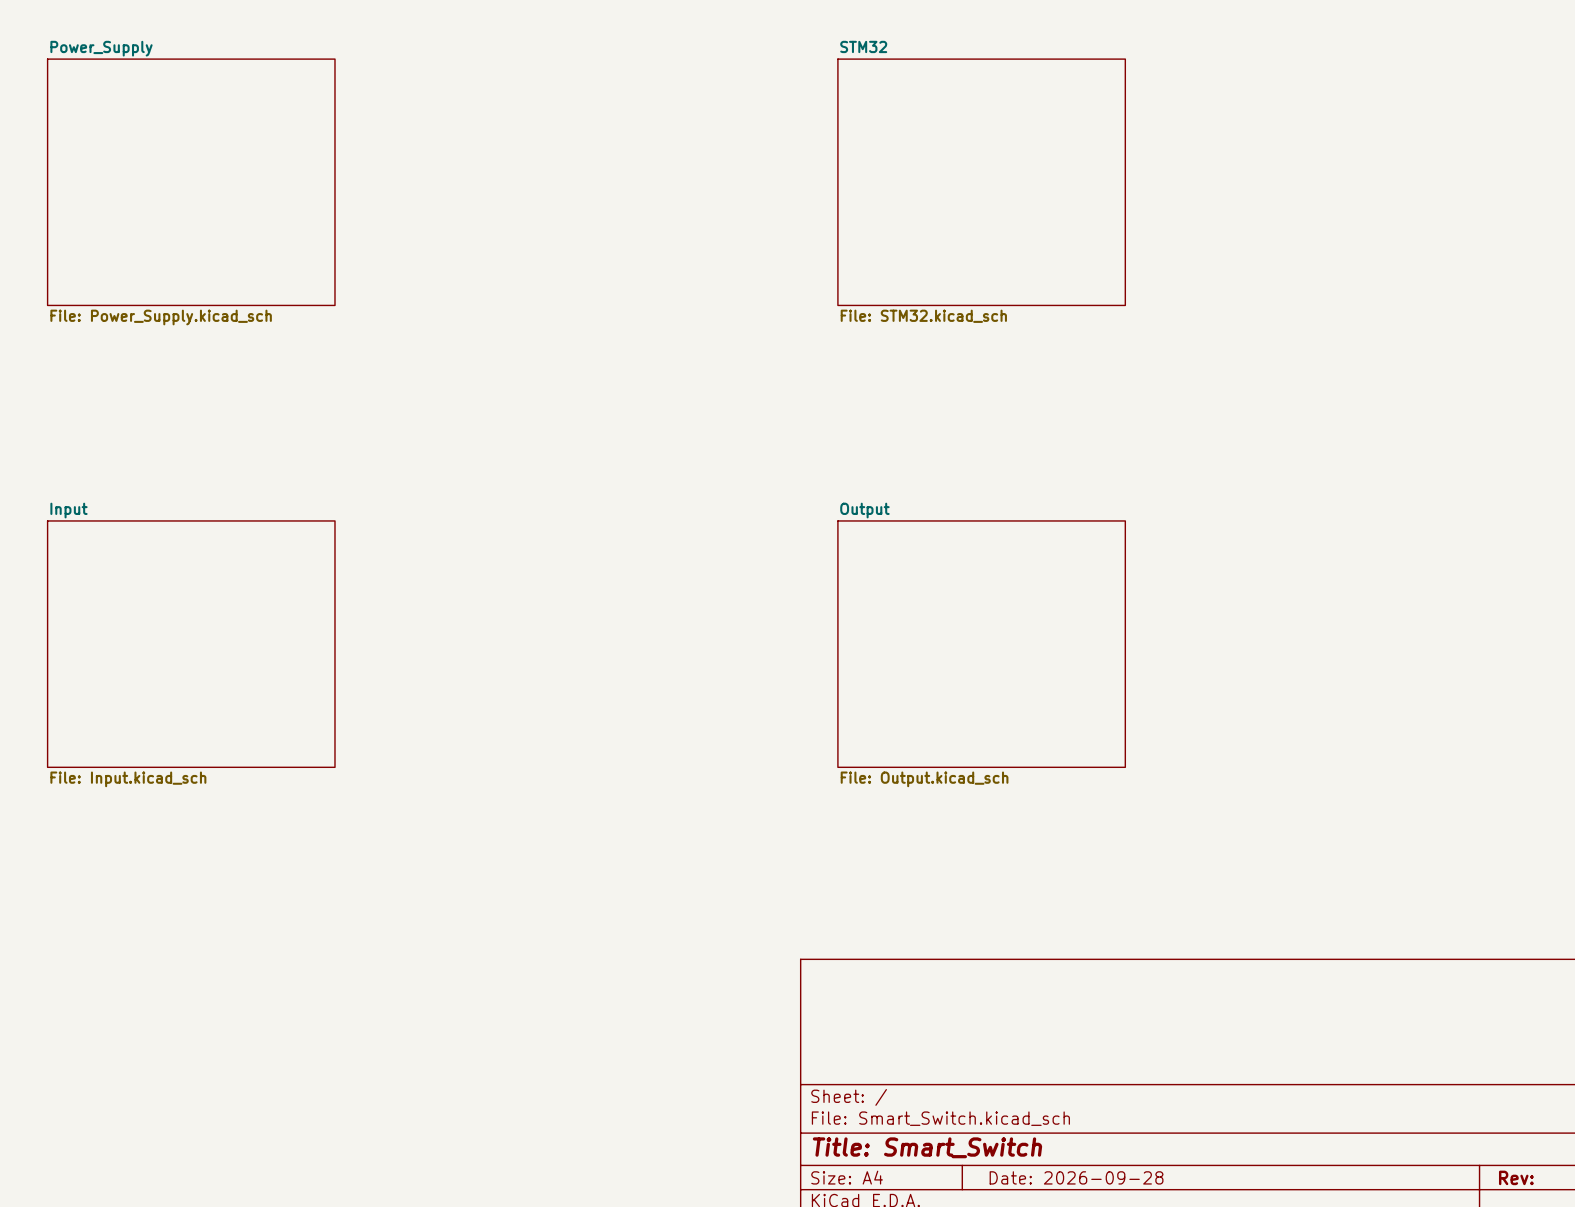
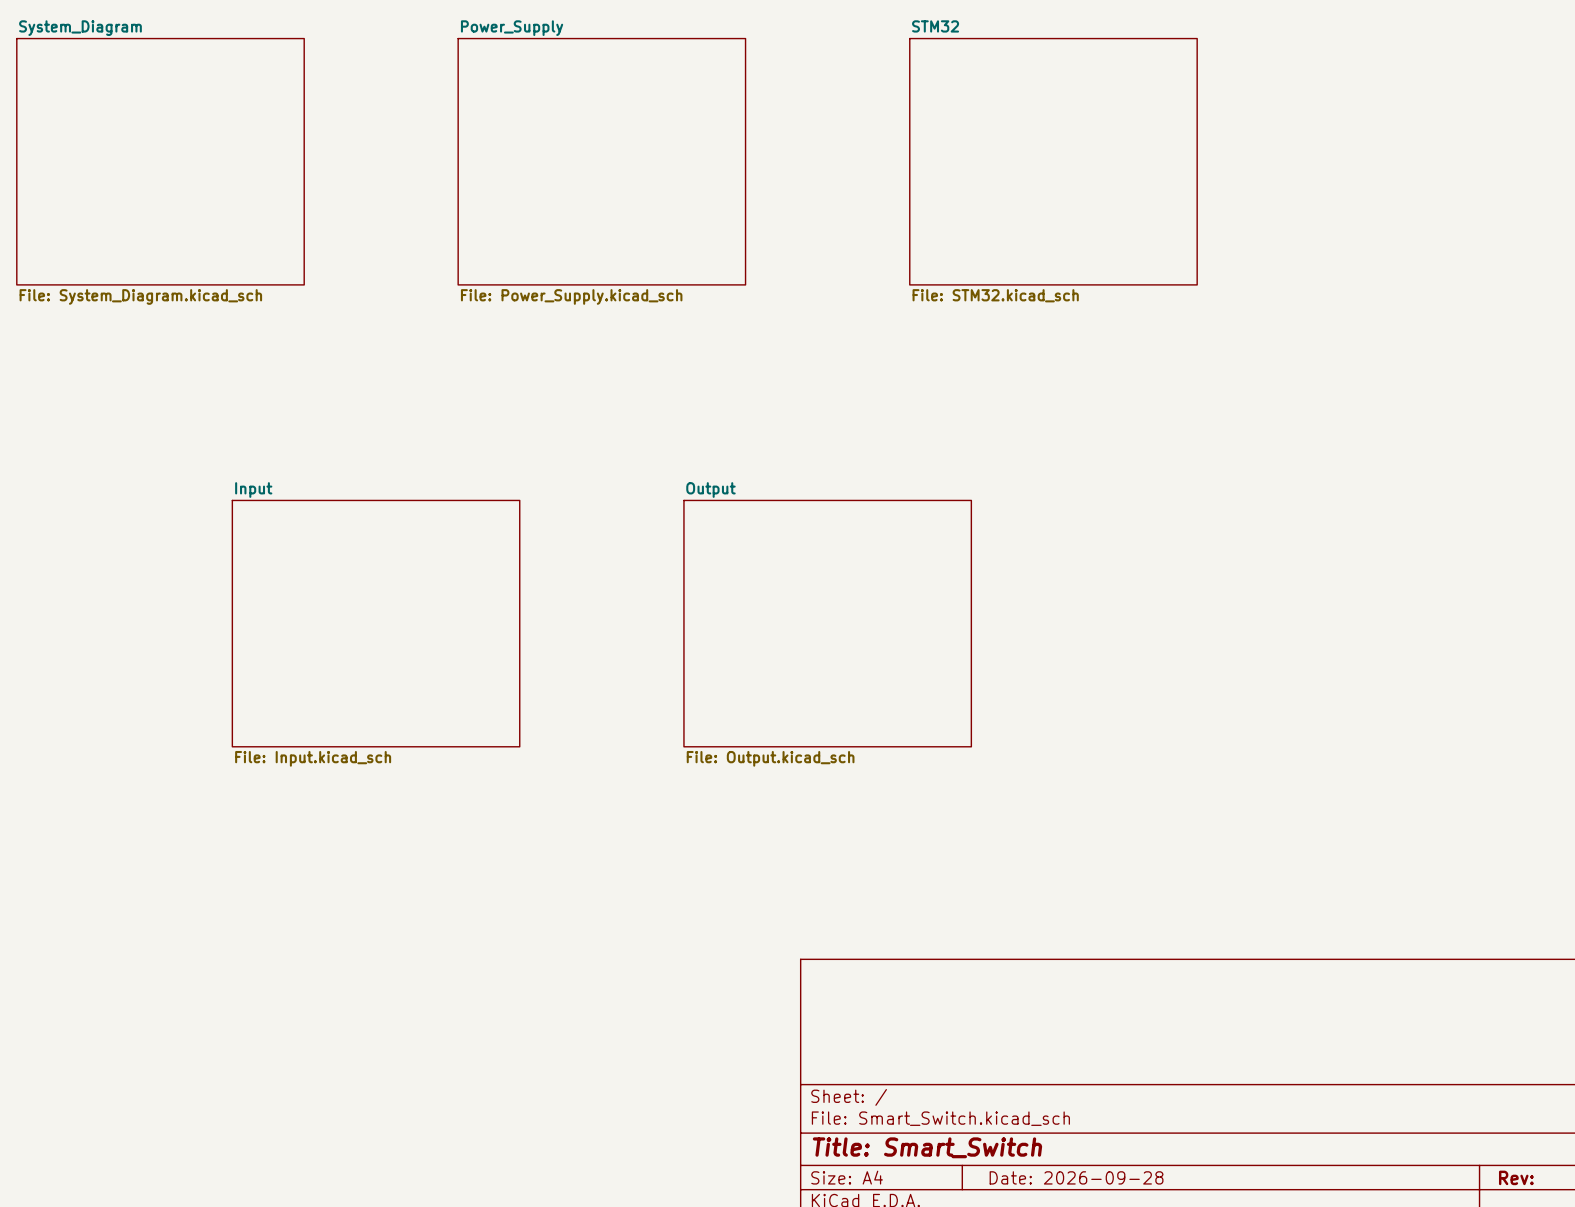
sheet System_Diagram: none -> File: System_Diagram.kicad_sch (160, 161)
sheet Power_Supply: none -> File: Power_Supply.kicad_sch (601, 161)
sheet Power_Supply: File: Power_Supply.kicad_sch (191, 182) -> none
sheet STM32 position: (981, 182) -> (1053, 161)
sheet Input position: (191, 644) -> (376, 623)
sheet Output position: (981, 644) -> (827, 623)

